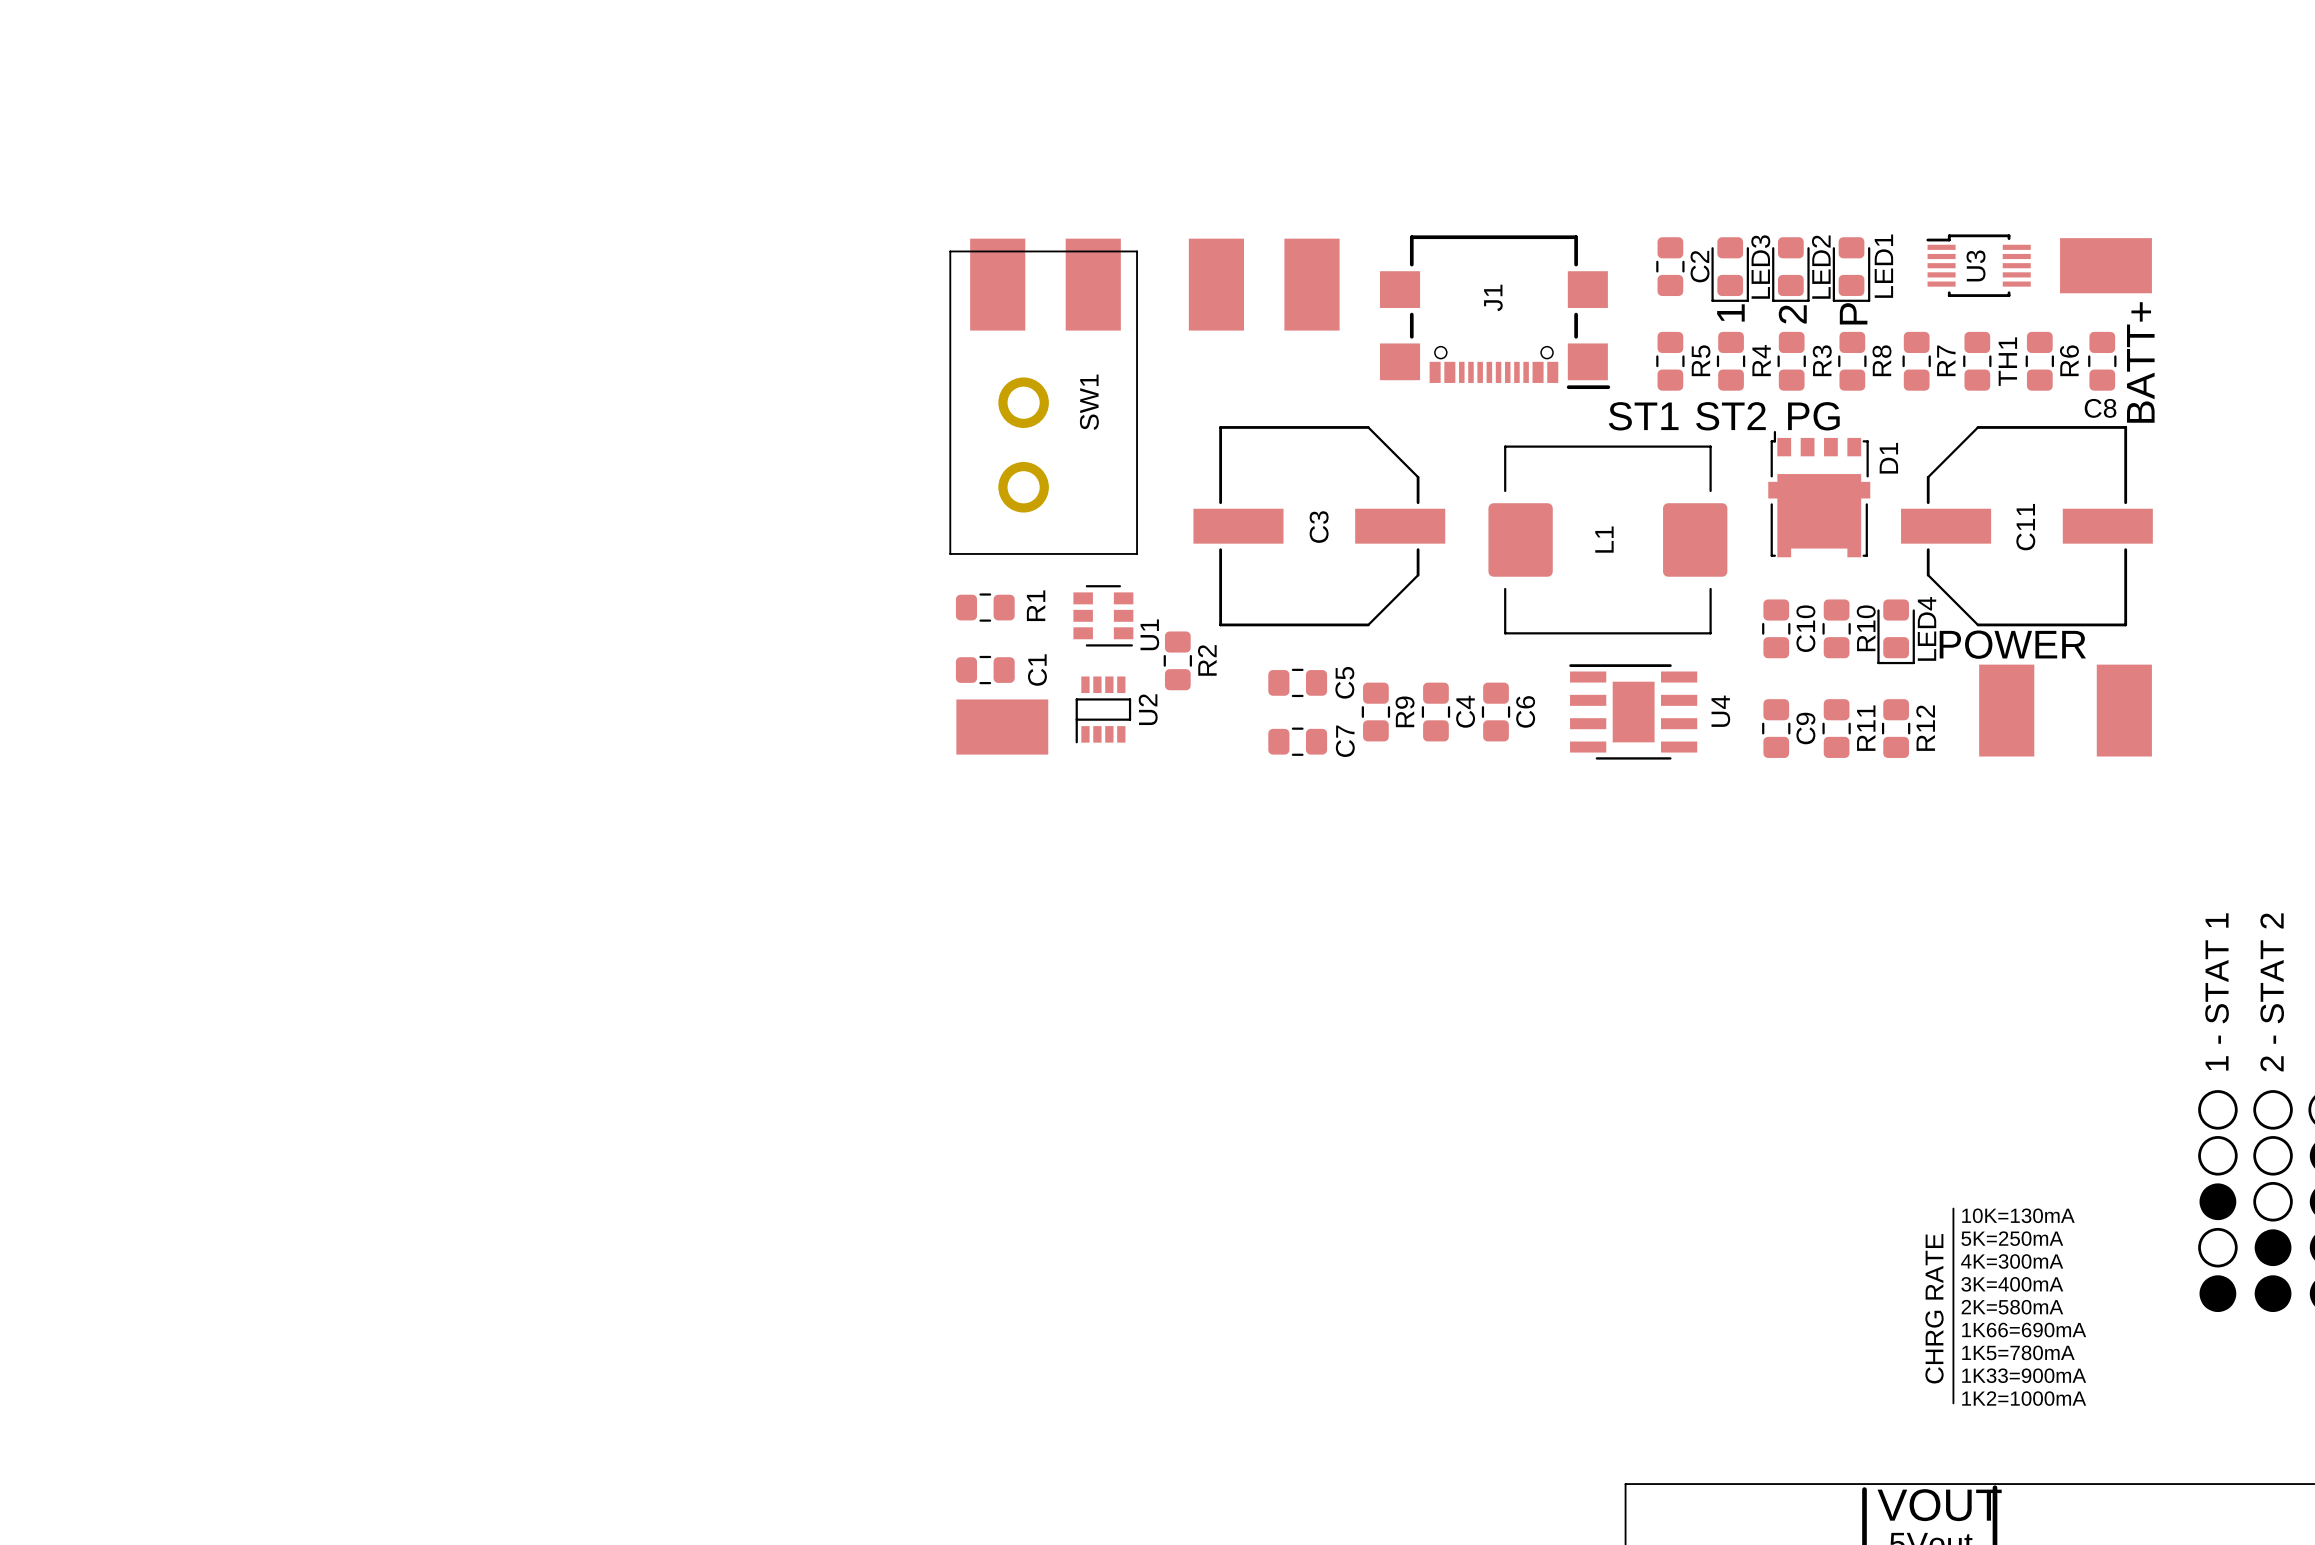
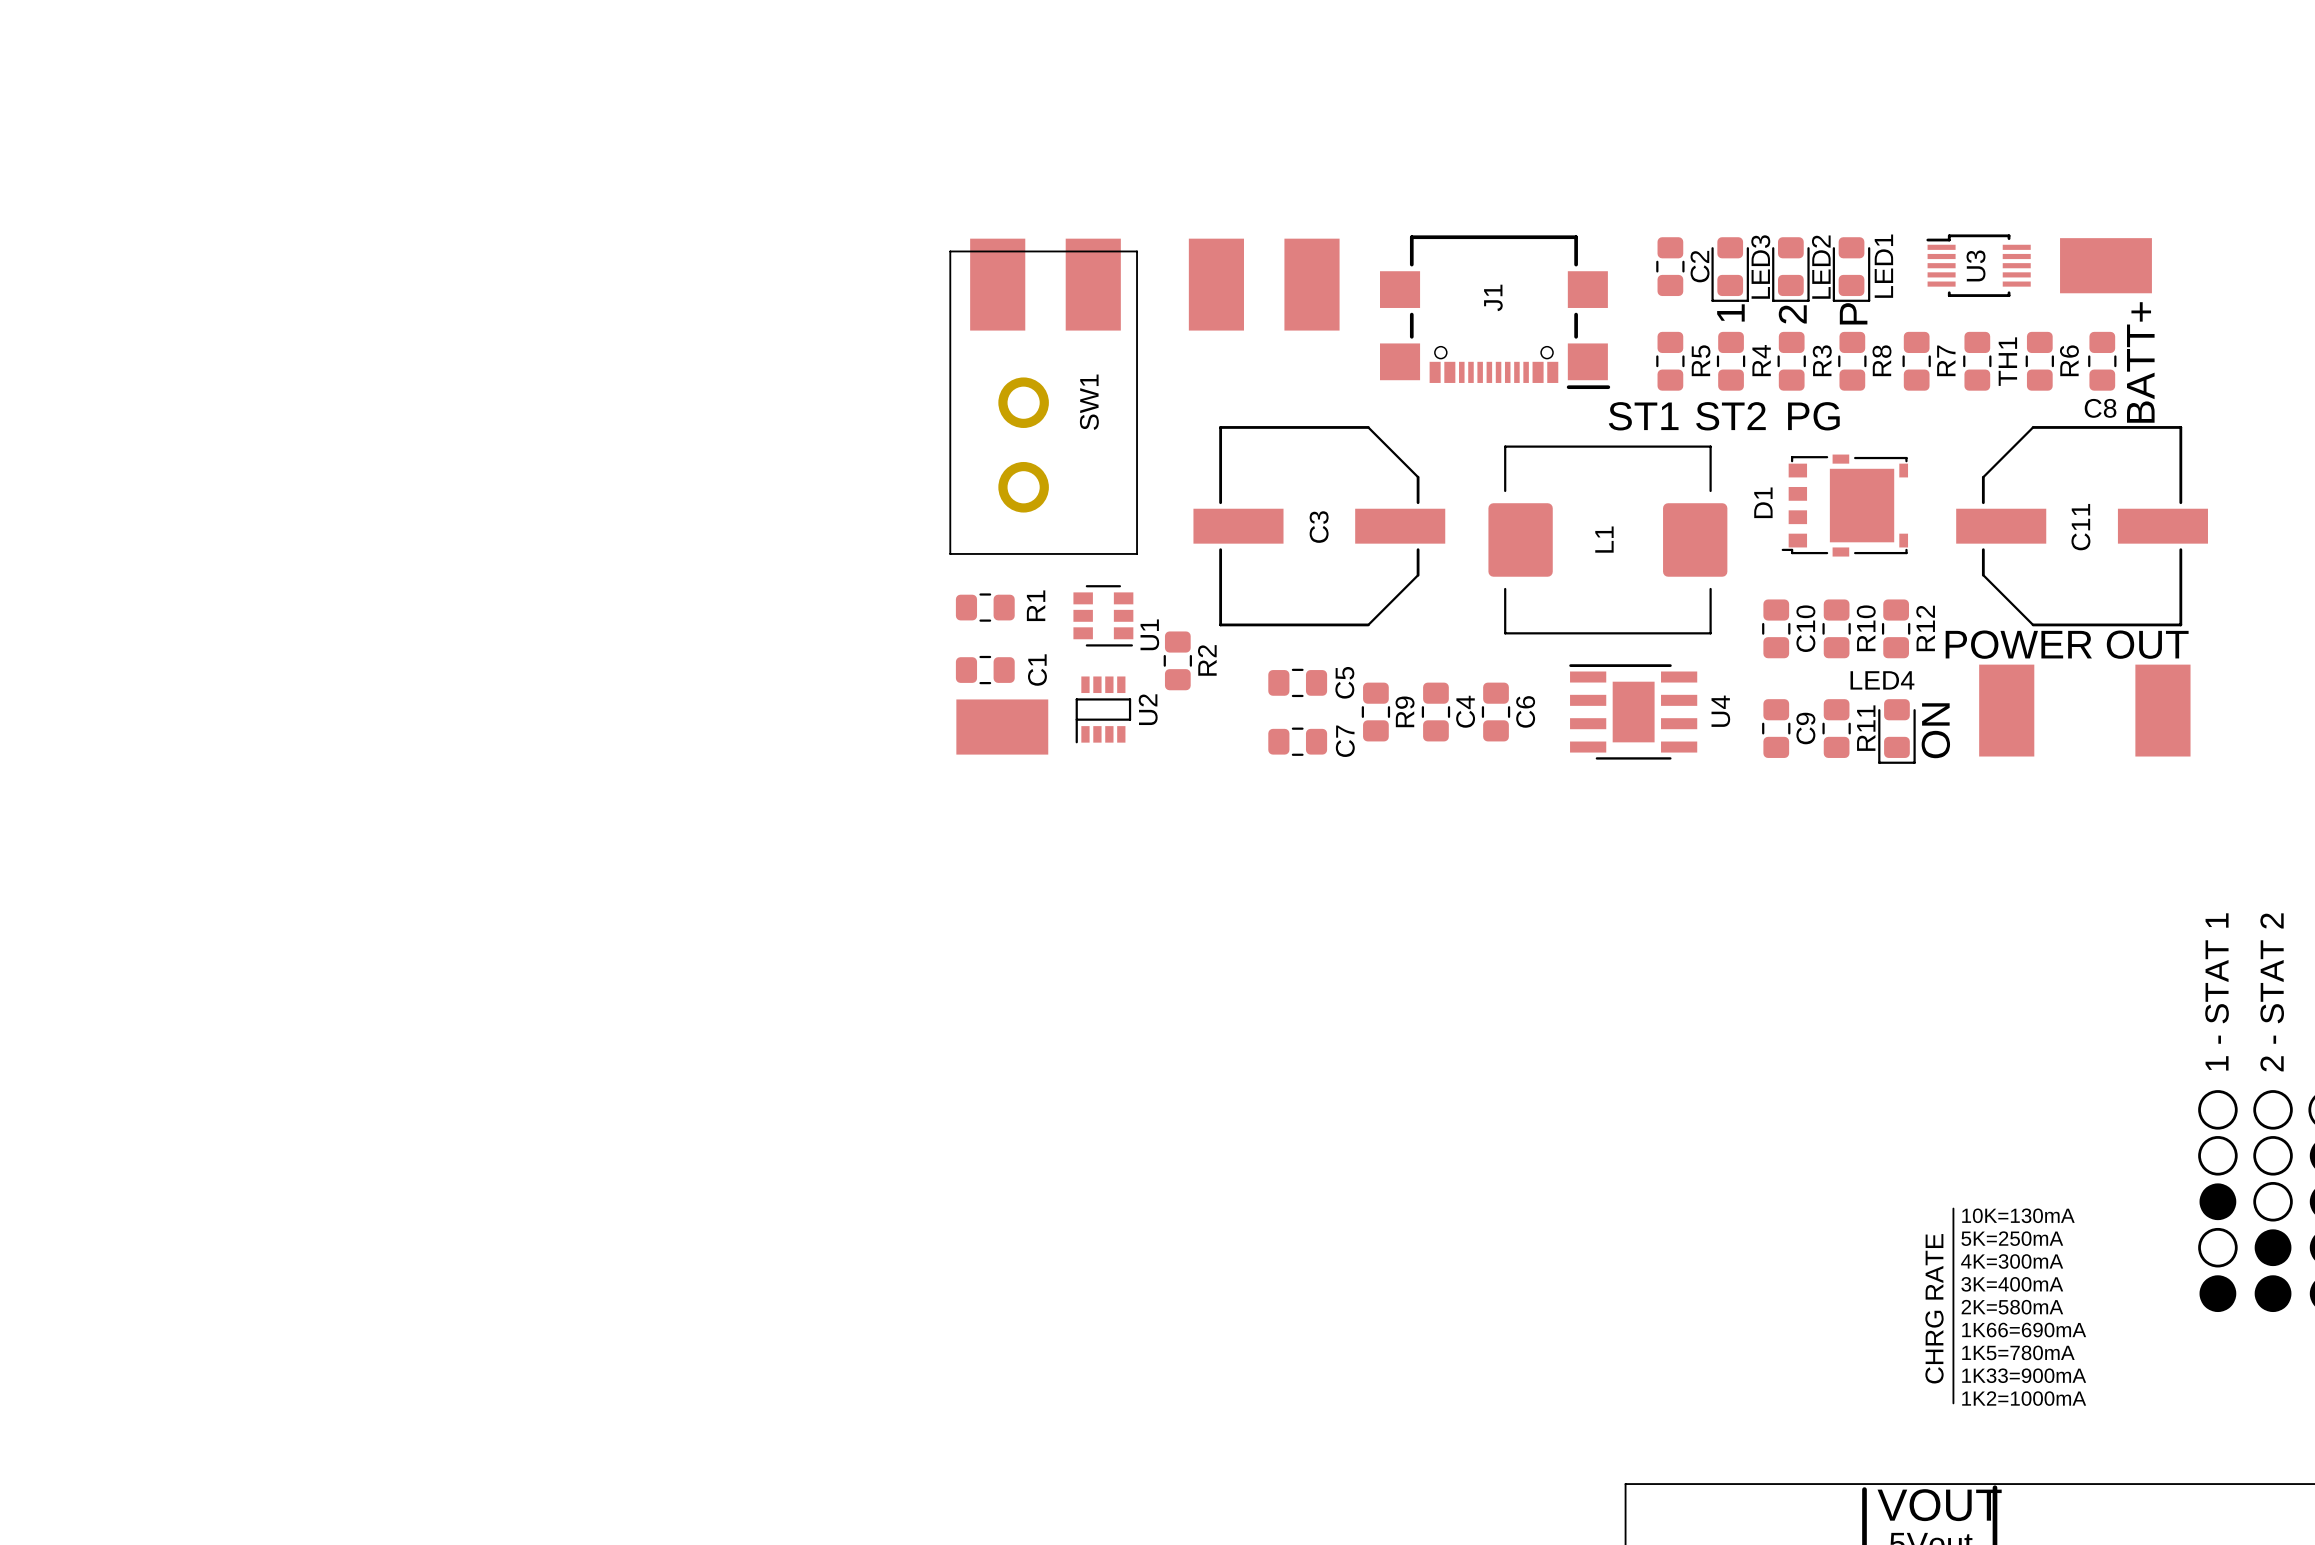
D1 footprint: [1768, 430, 1871, 558] -> [1781, 454, 1909, 557]
D1 name position: D1 (1888, 458) -> D1 (1763, 502)
C11 position: (2026, 526) -> (2082, 526)
LED4 name rotation: 0° (1927, 628) -> 90° clockwise (1882, 680)
LED4 position: (1896, 631) -> (1896, 731)
text: POWER (2012, 644) -> POWER OUT (2067, 644)
part position: (2124, 710) -> (2162, 710)
R12 position: (1896, 728) -> (1896, 628)
text: none -> ON (1935, 730)

